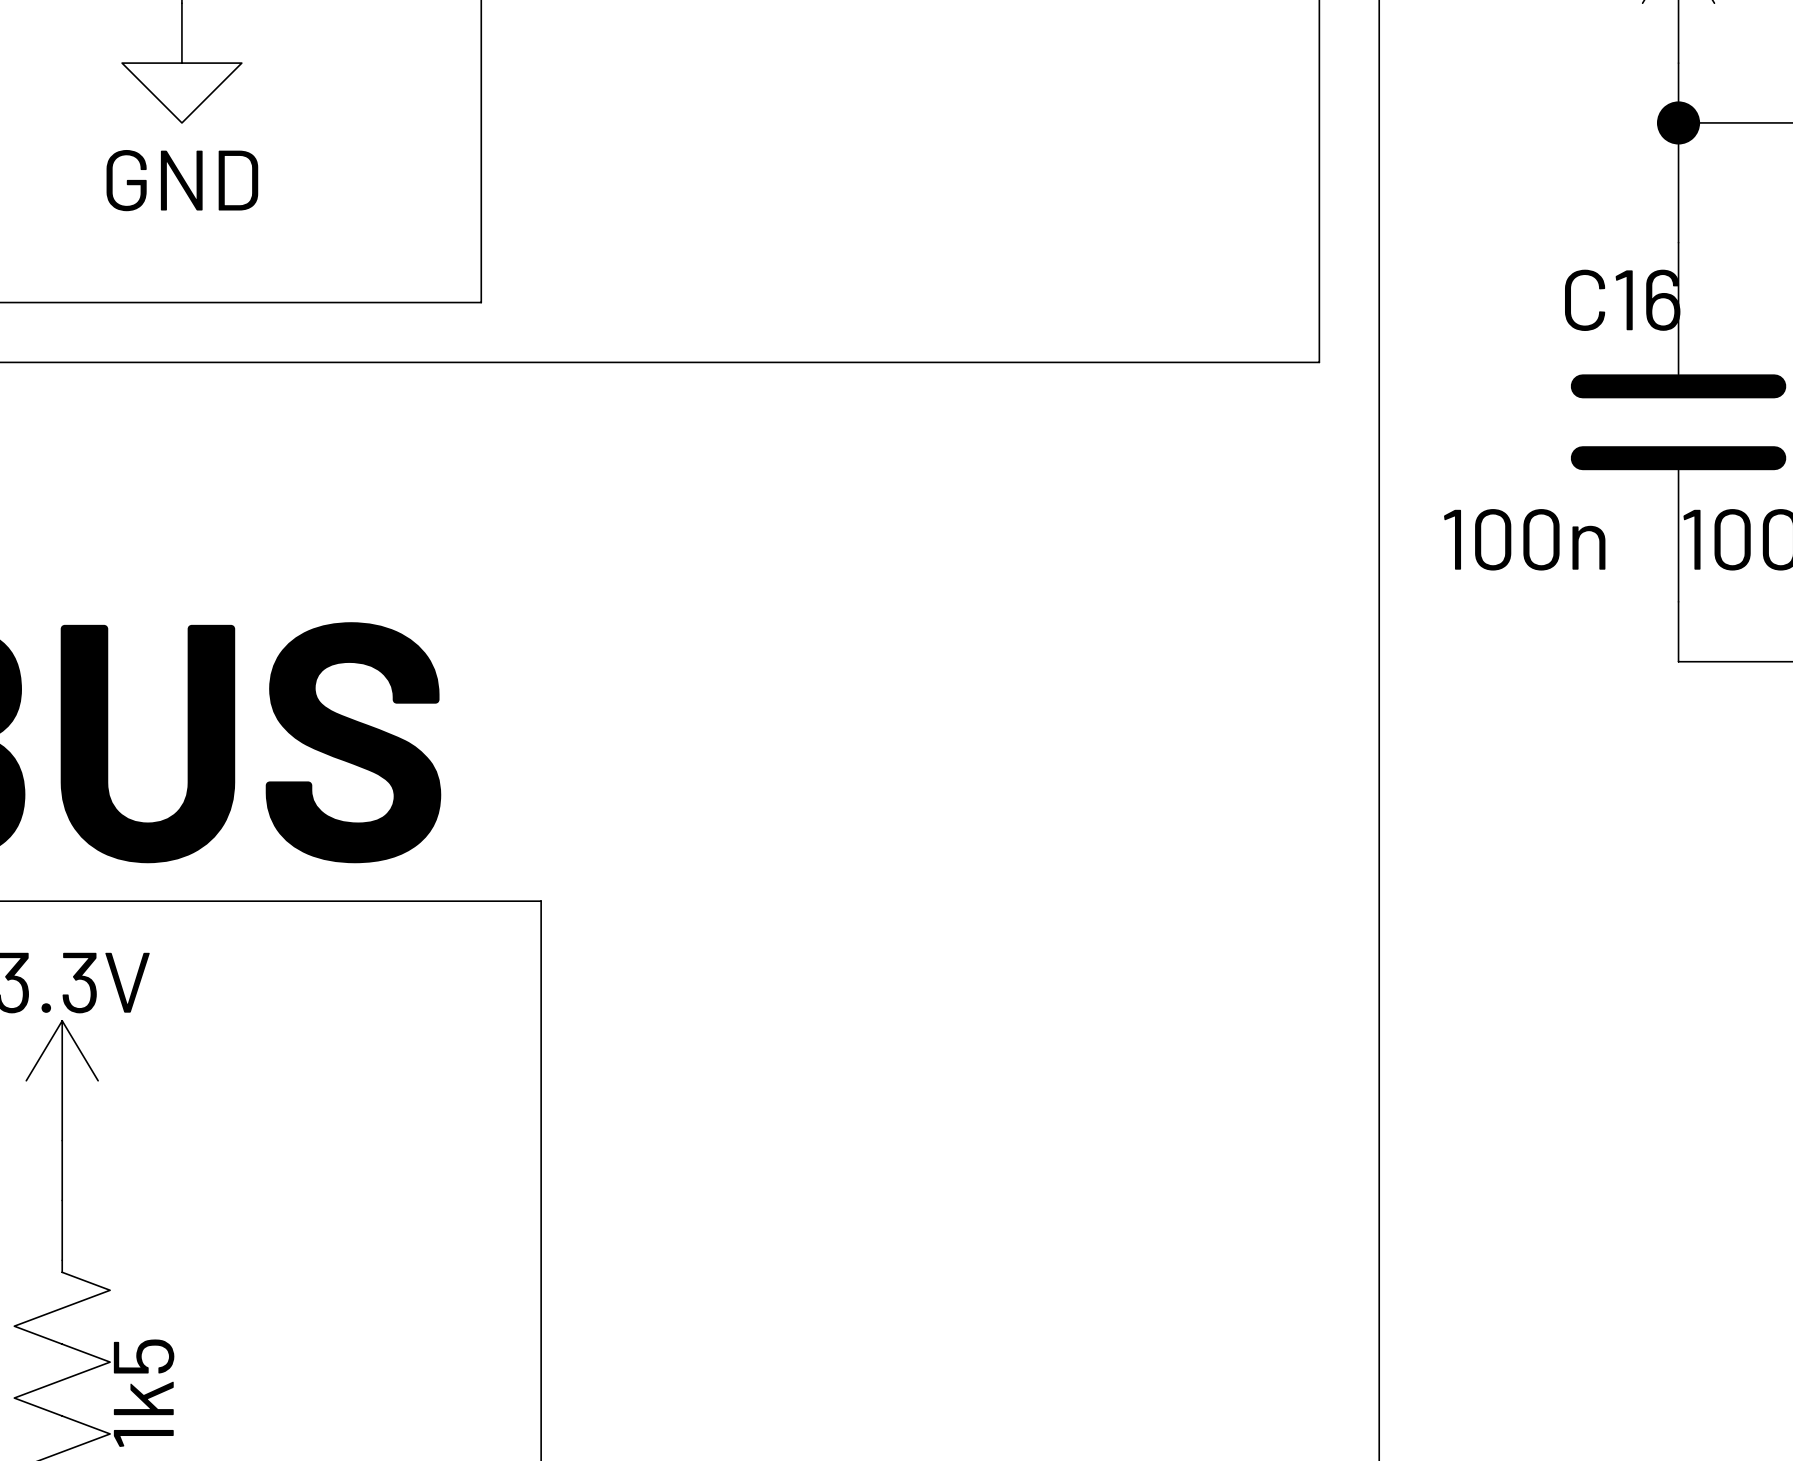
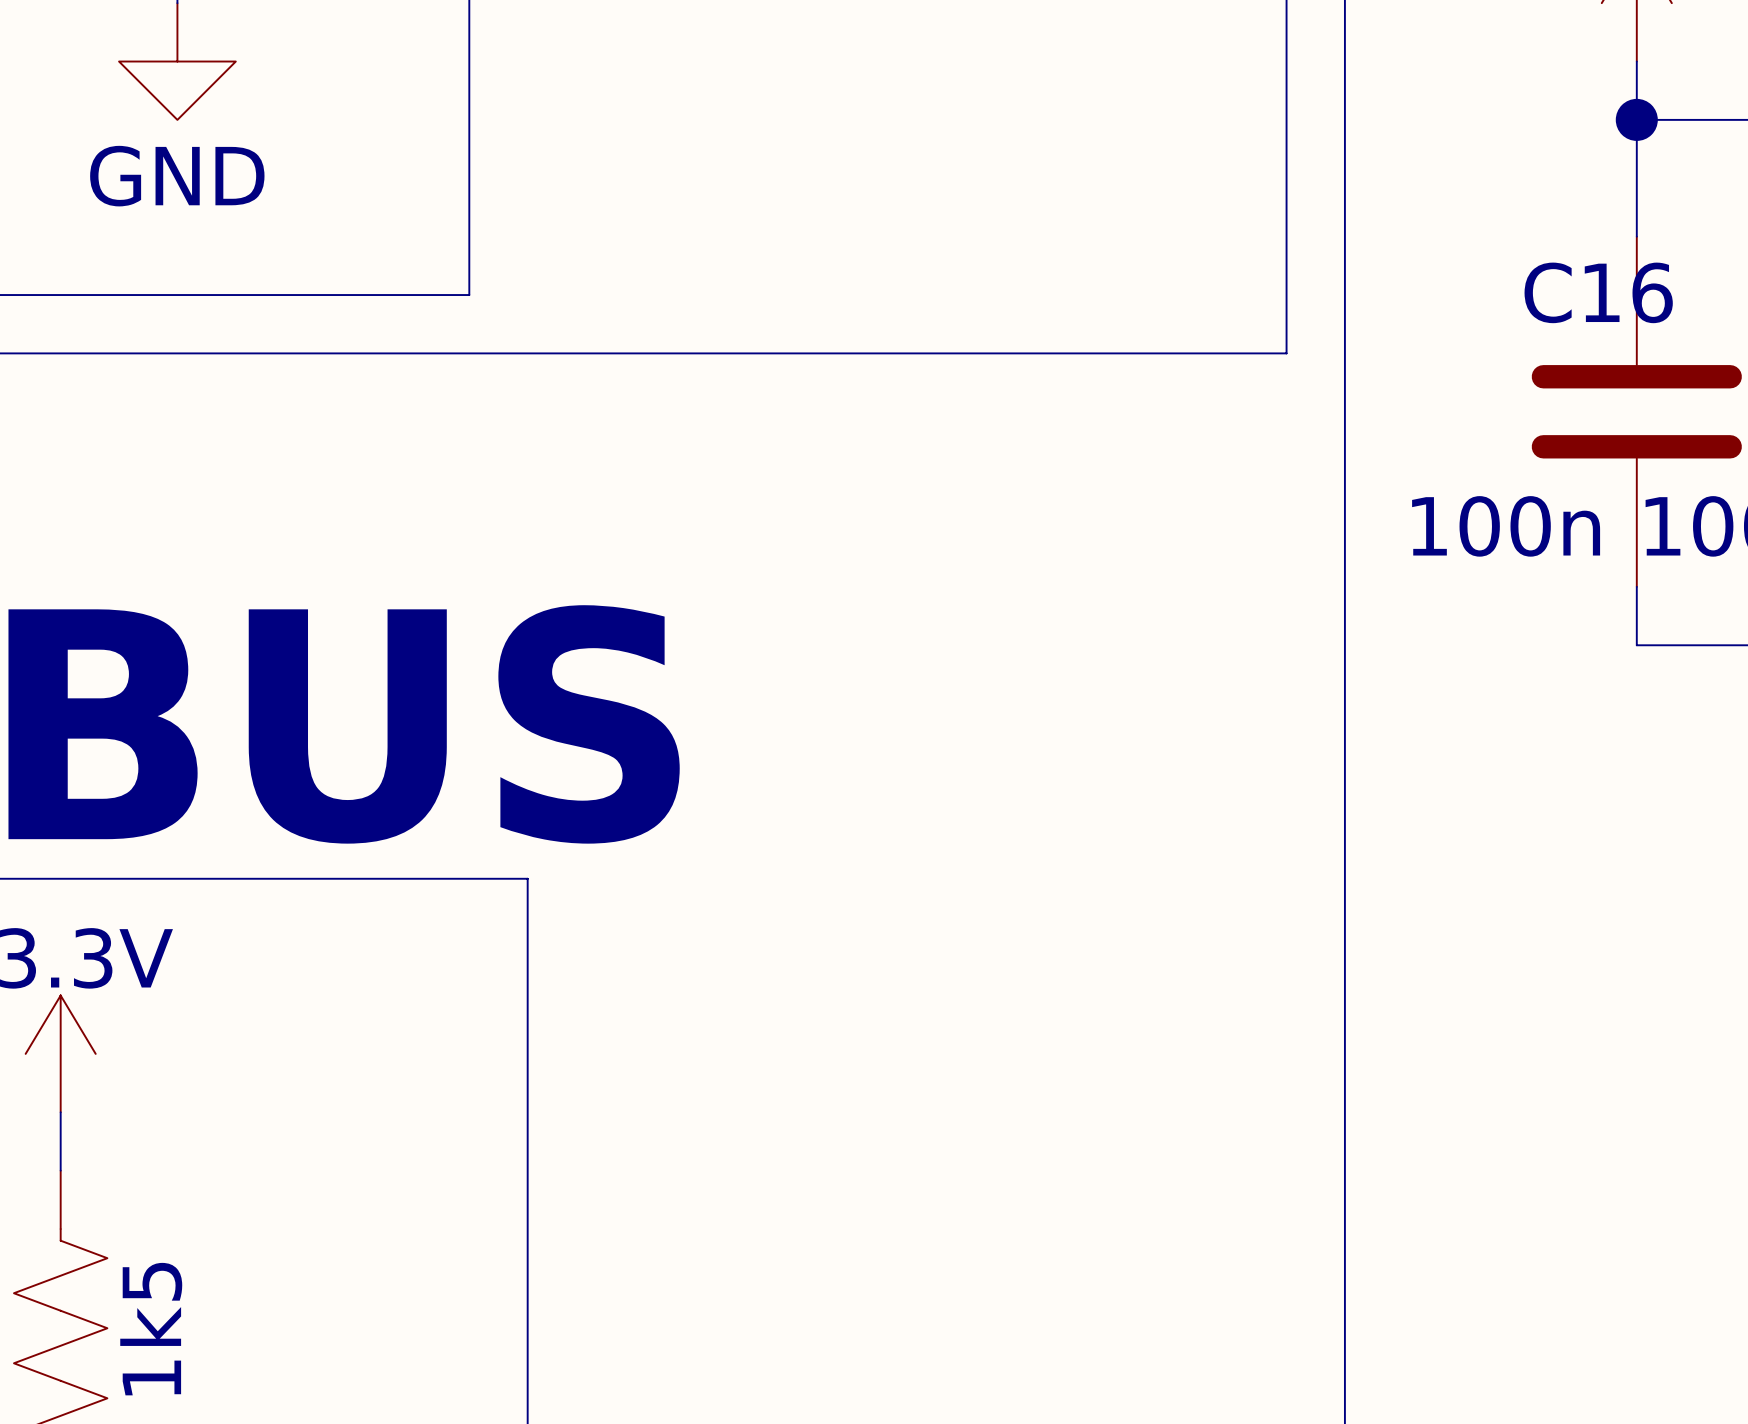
part value position: 1k5 (144, 1393) -> 1k5 (151, 1329)

